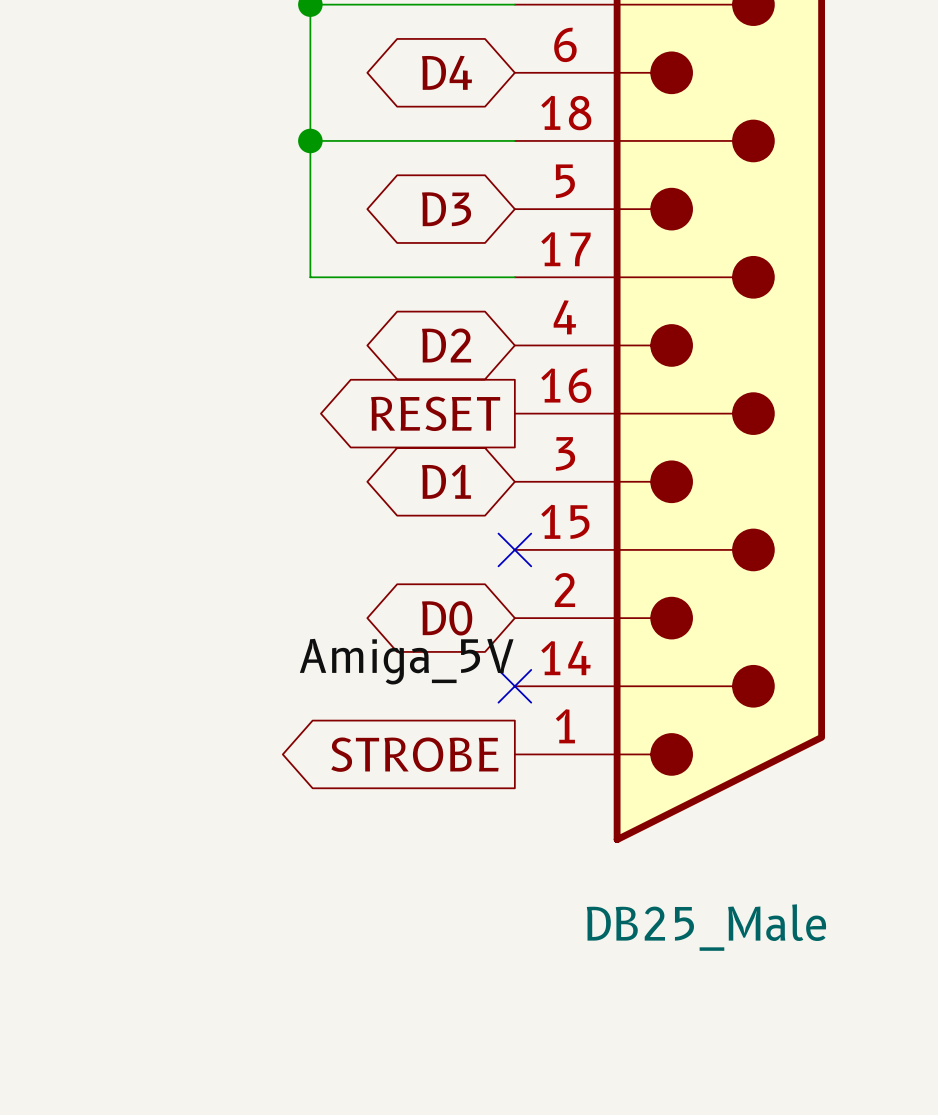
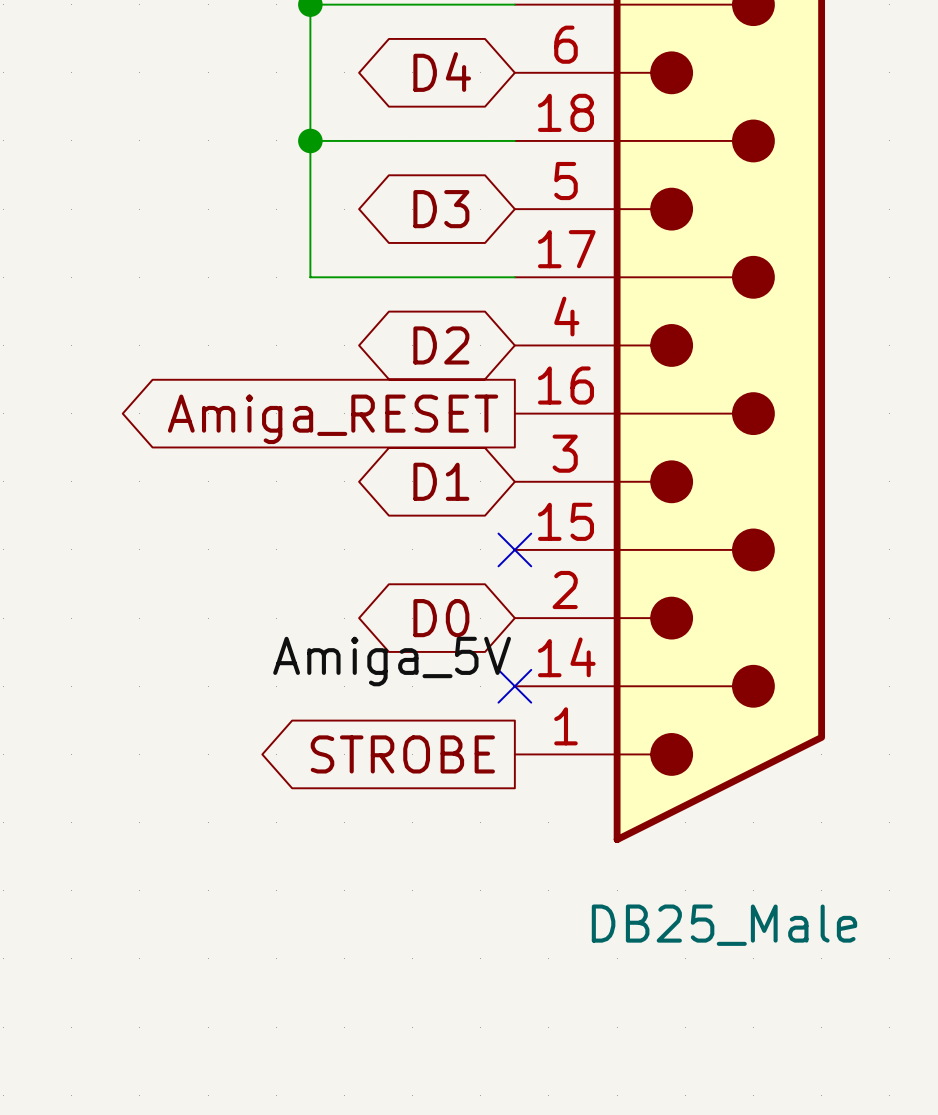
global label: RESET (435, 413) -> Amiga_RESET (333, 419)

